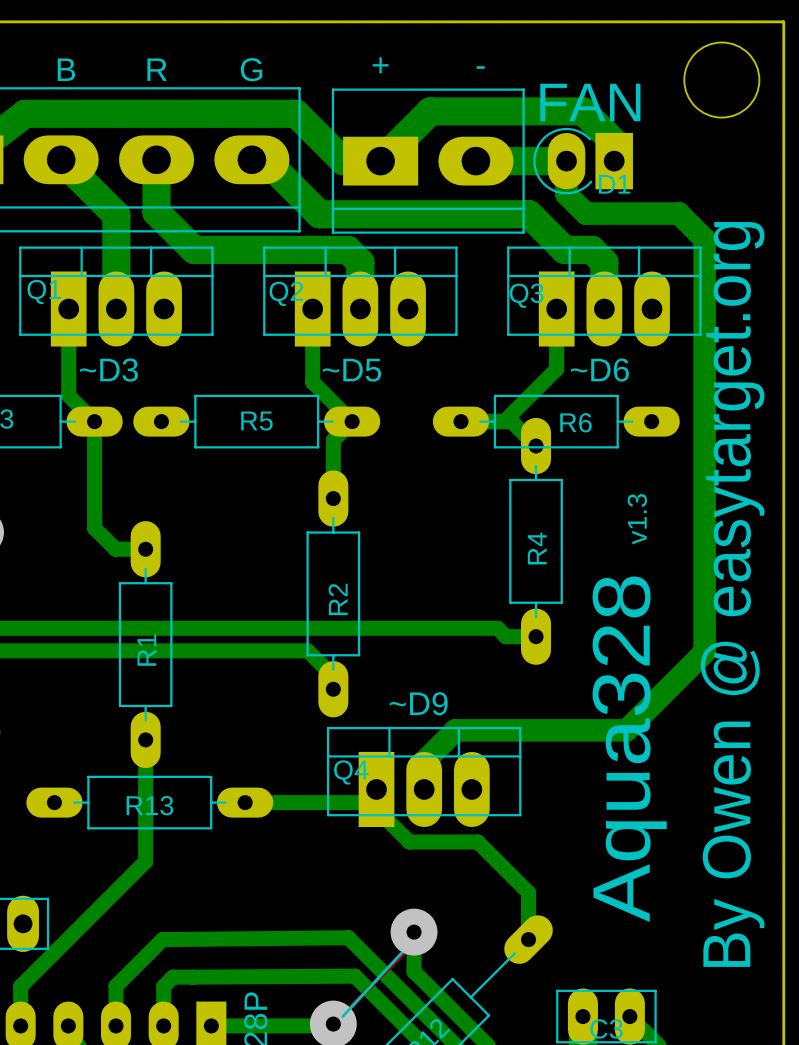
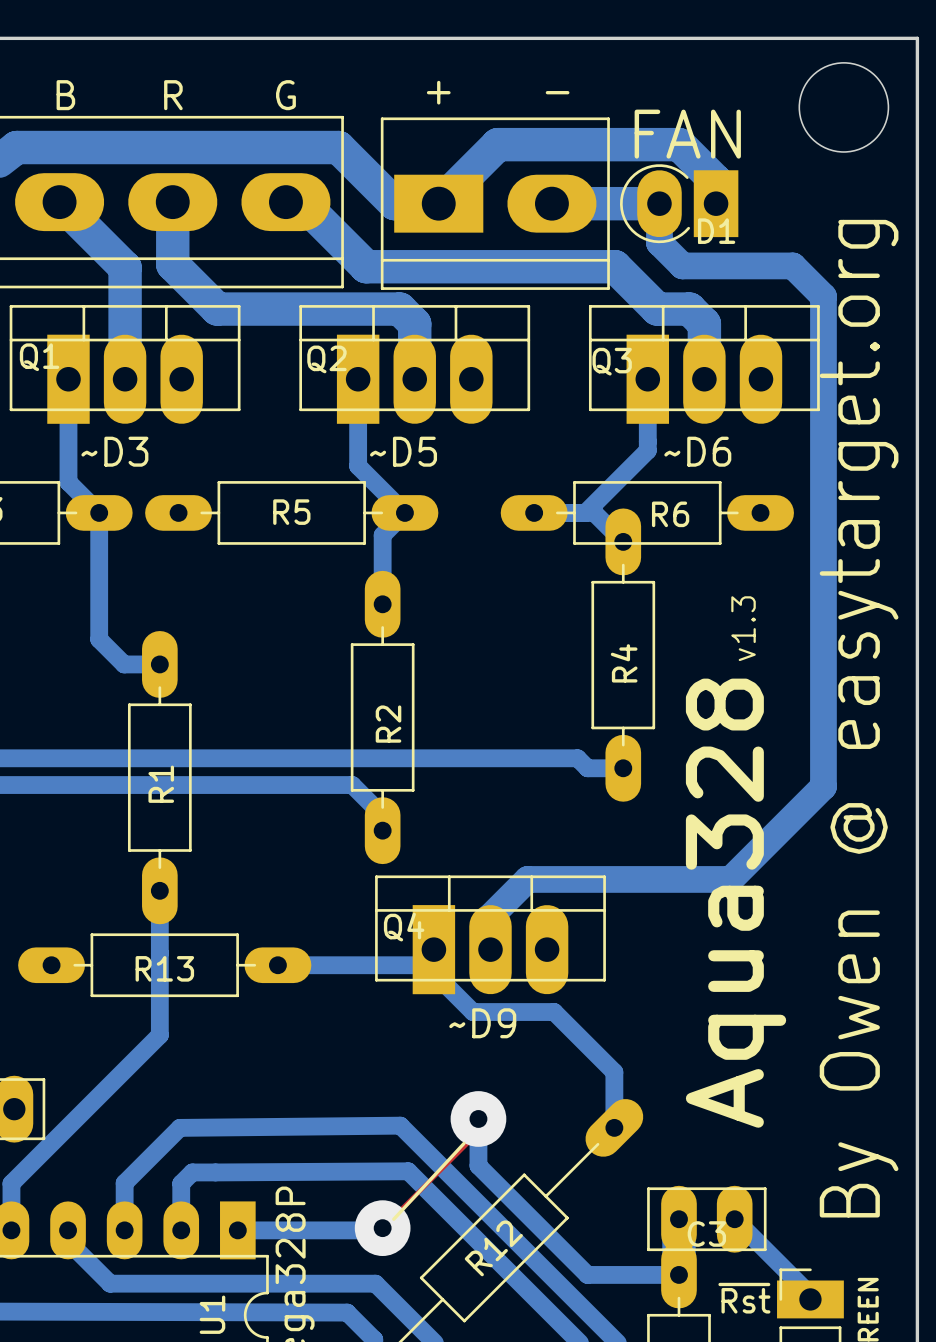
text position: ~D9 (418, 703) -> ~D9 (482, 1023)

